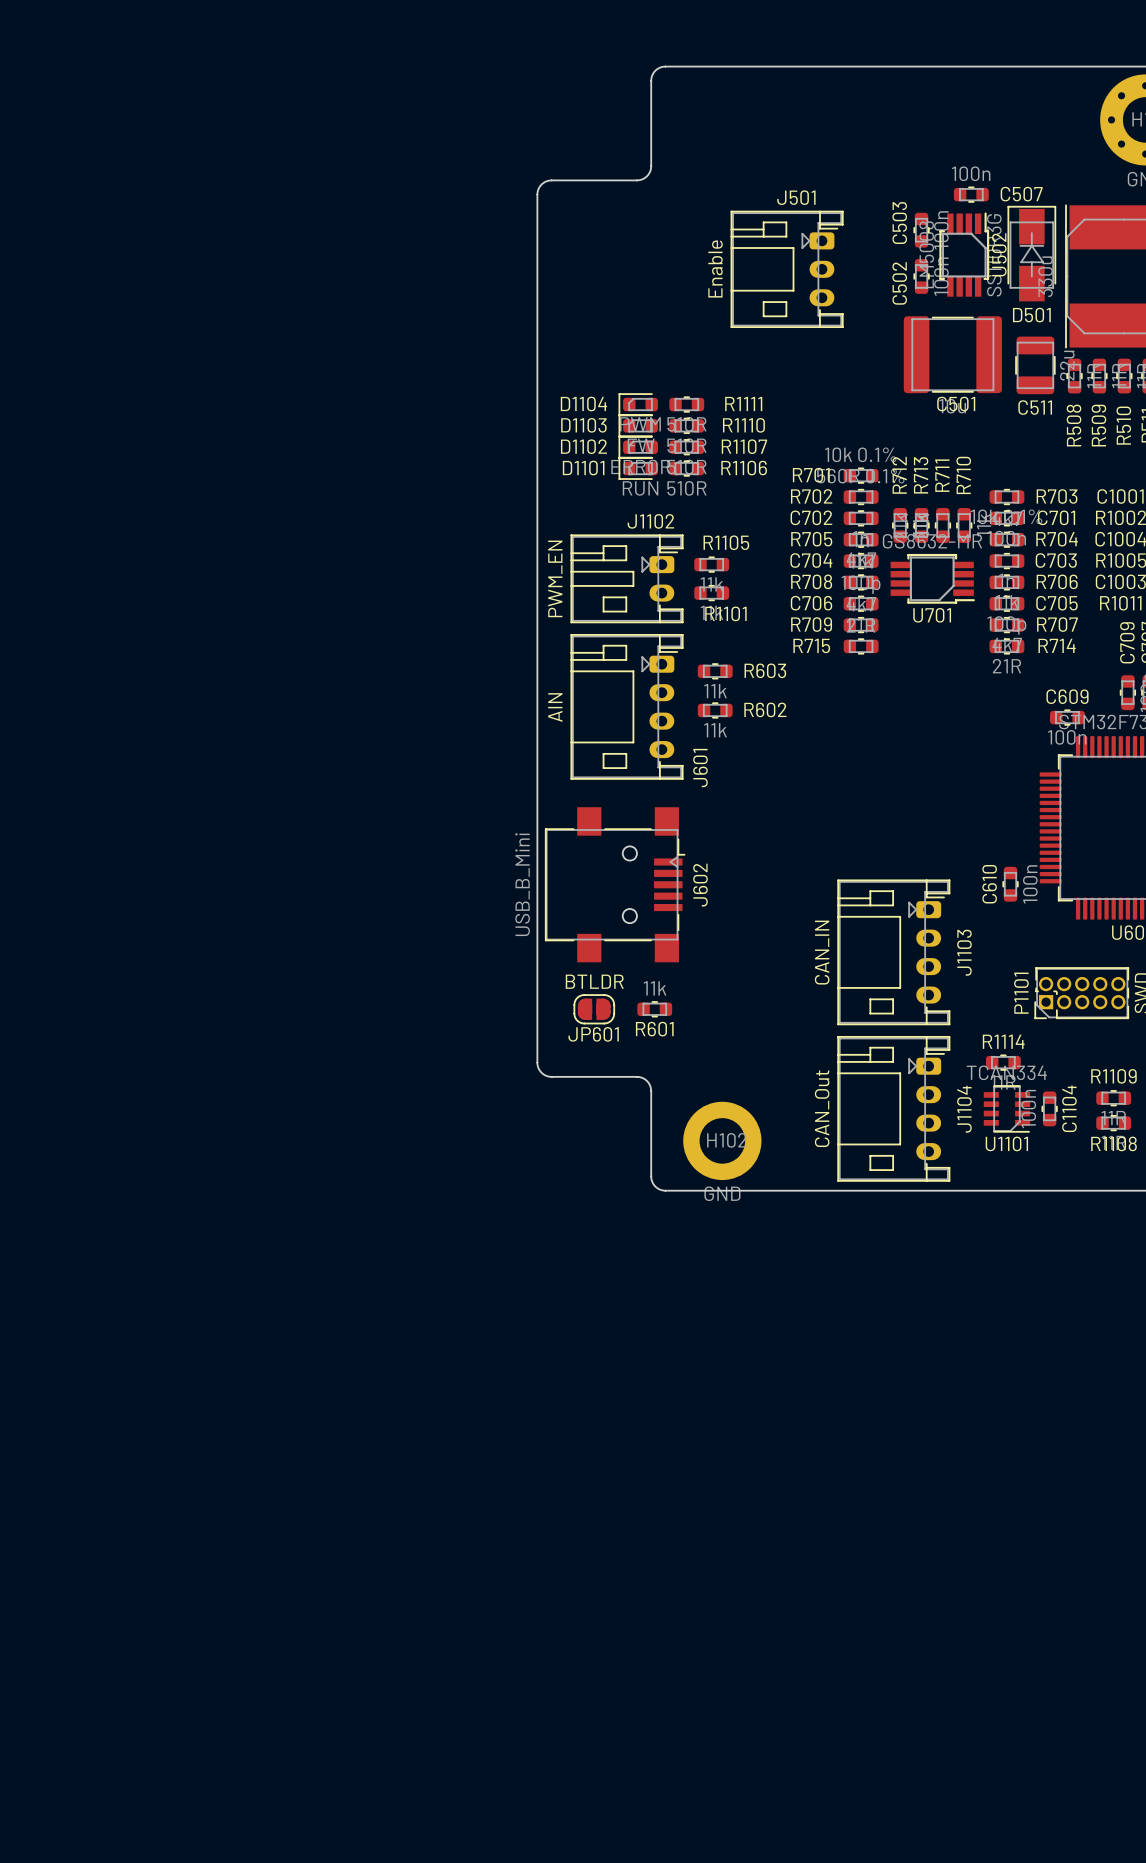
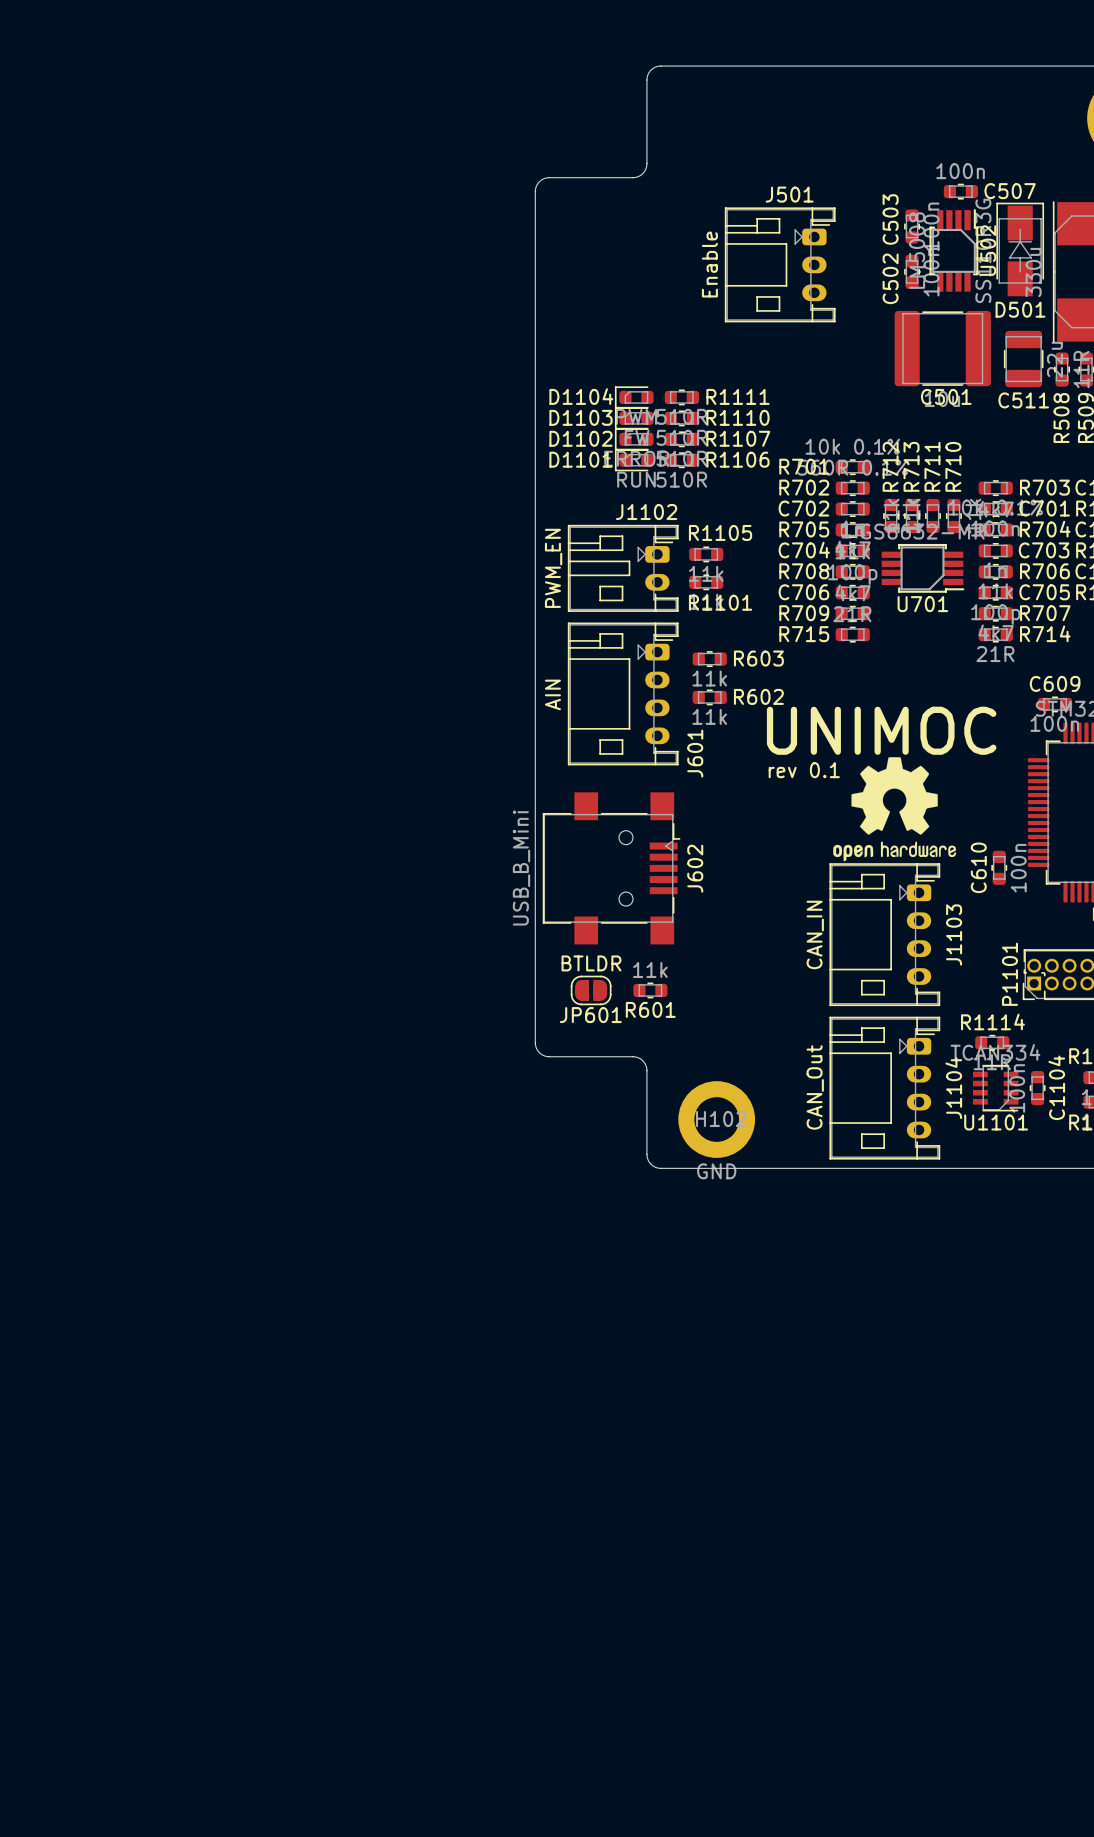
text: none -> UNIMOC (881, 730)
drawing: none -> [833, 757, 957, 862]
text: none -> rev 0.1 (804, 770)

